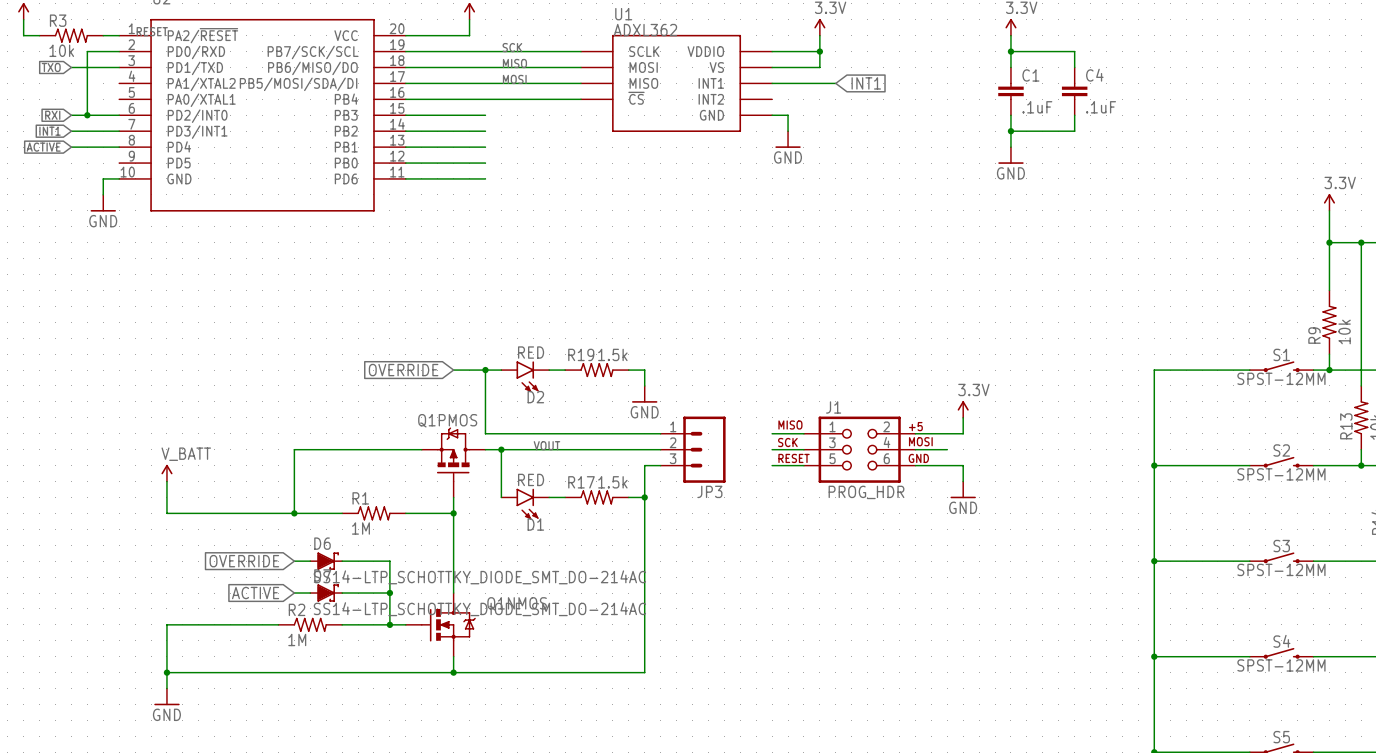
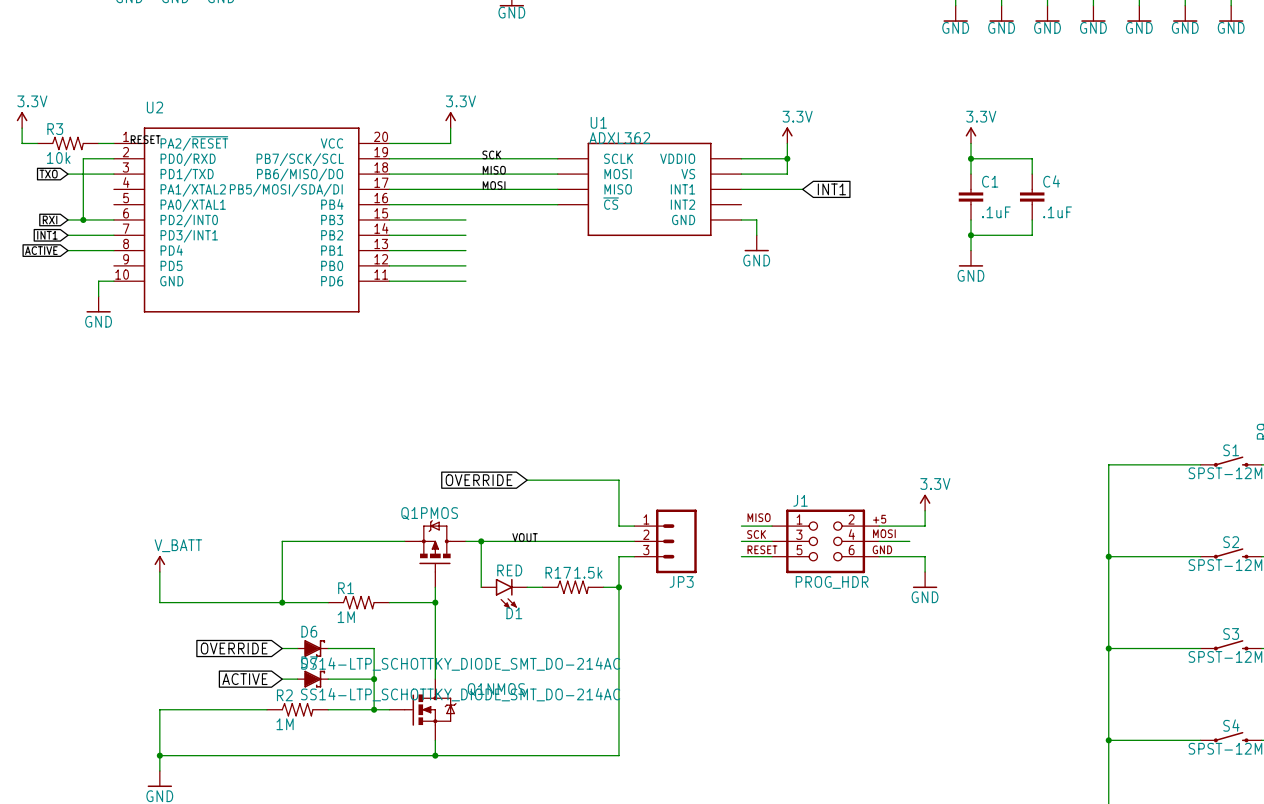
global label position: OVERRIDE (403, 370) -> OVERRIDE (479, 480)
wire: (453, 370) (501, 370) -> none
wire: (485, 370) (485, 433) (644, 433) -> (527, 480) (618, 480) (618, 526)
junction: (485, 370) -> none
wire: (549, 370) (565, 370) -> none
R19: 1.5k (596, 370) -> none
wire: (628, 370) (644, 370) (644, 385) -> none
D2: RED (525, 376) -> none
power symbol: GND (644, 394) -> none

